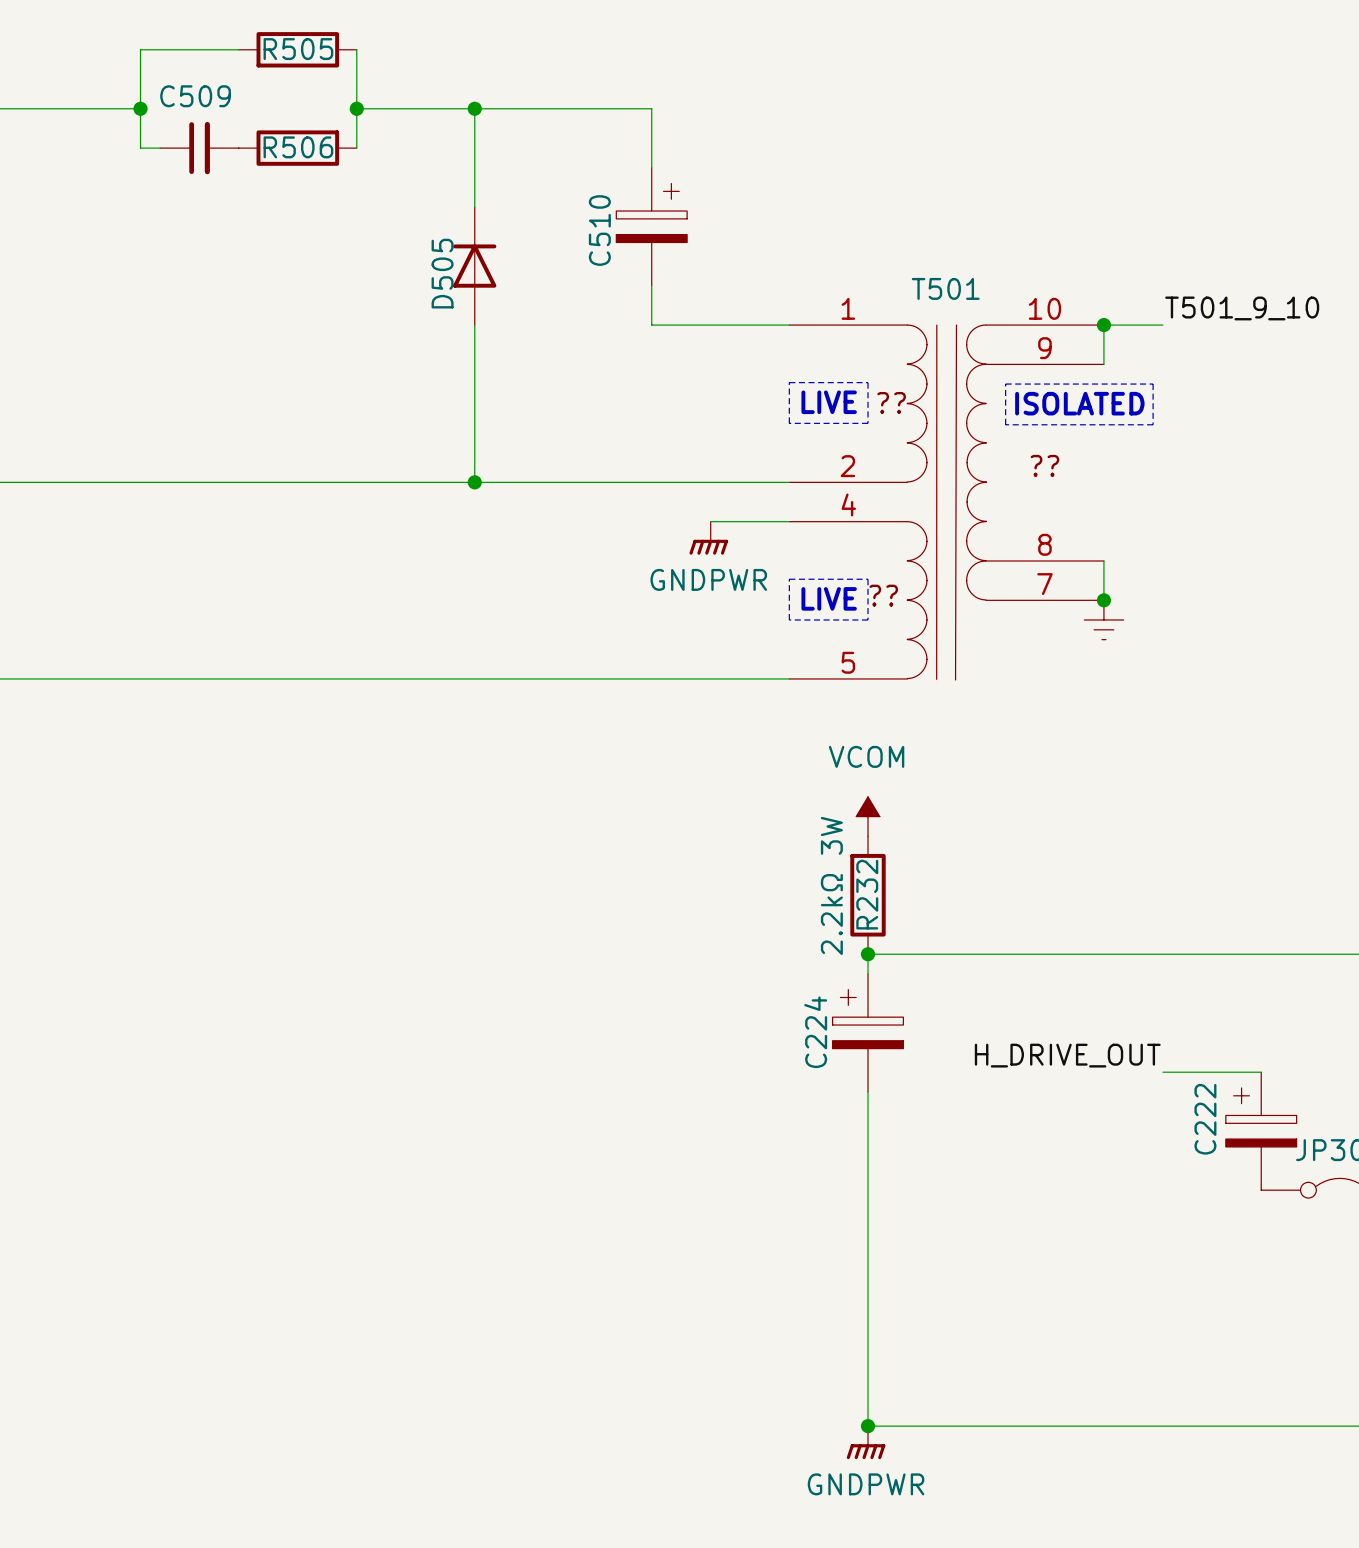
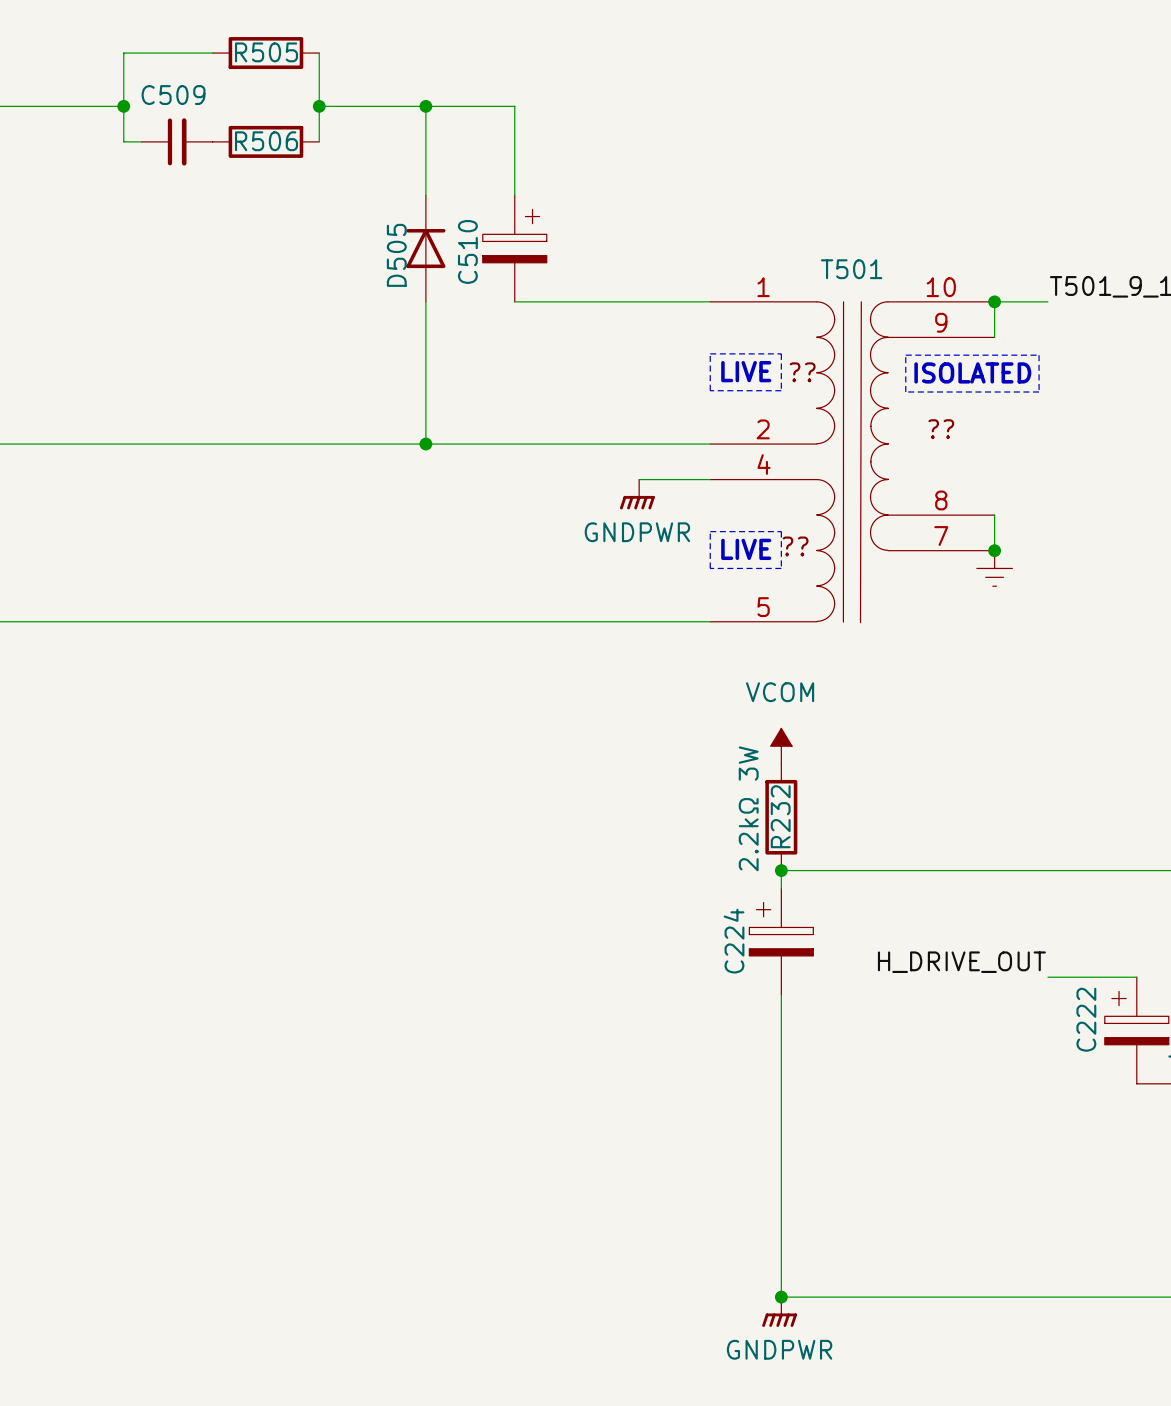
wire: (573, 108) (651, 108) (651, 167) -> (514, 106) (514, 195)
C510 position: (651, 226) -> (514, 248)
wire: (651, 285) (651, 325) -> (514, 301) (585, 301)

